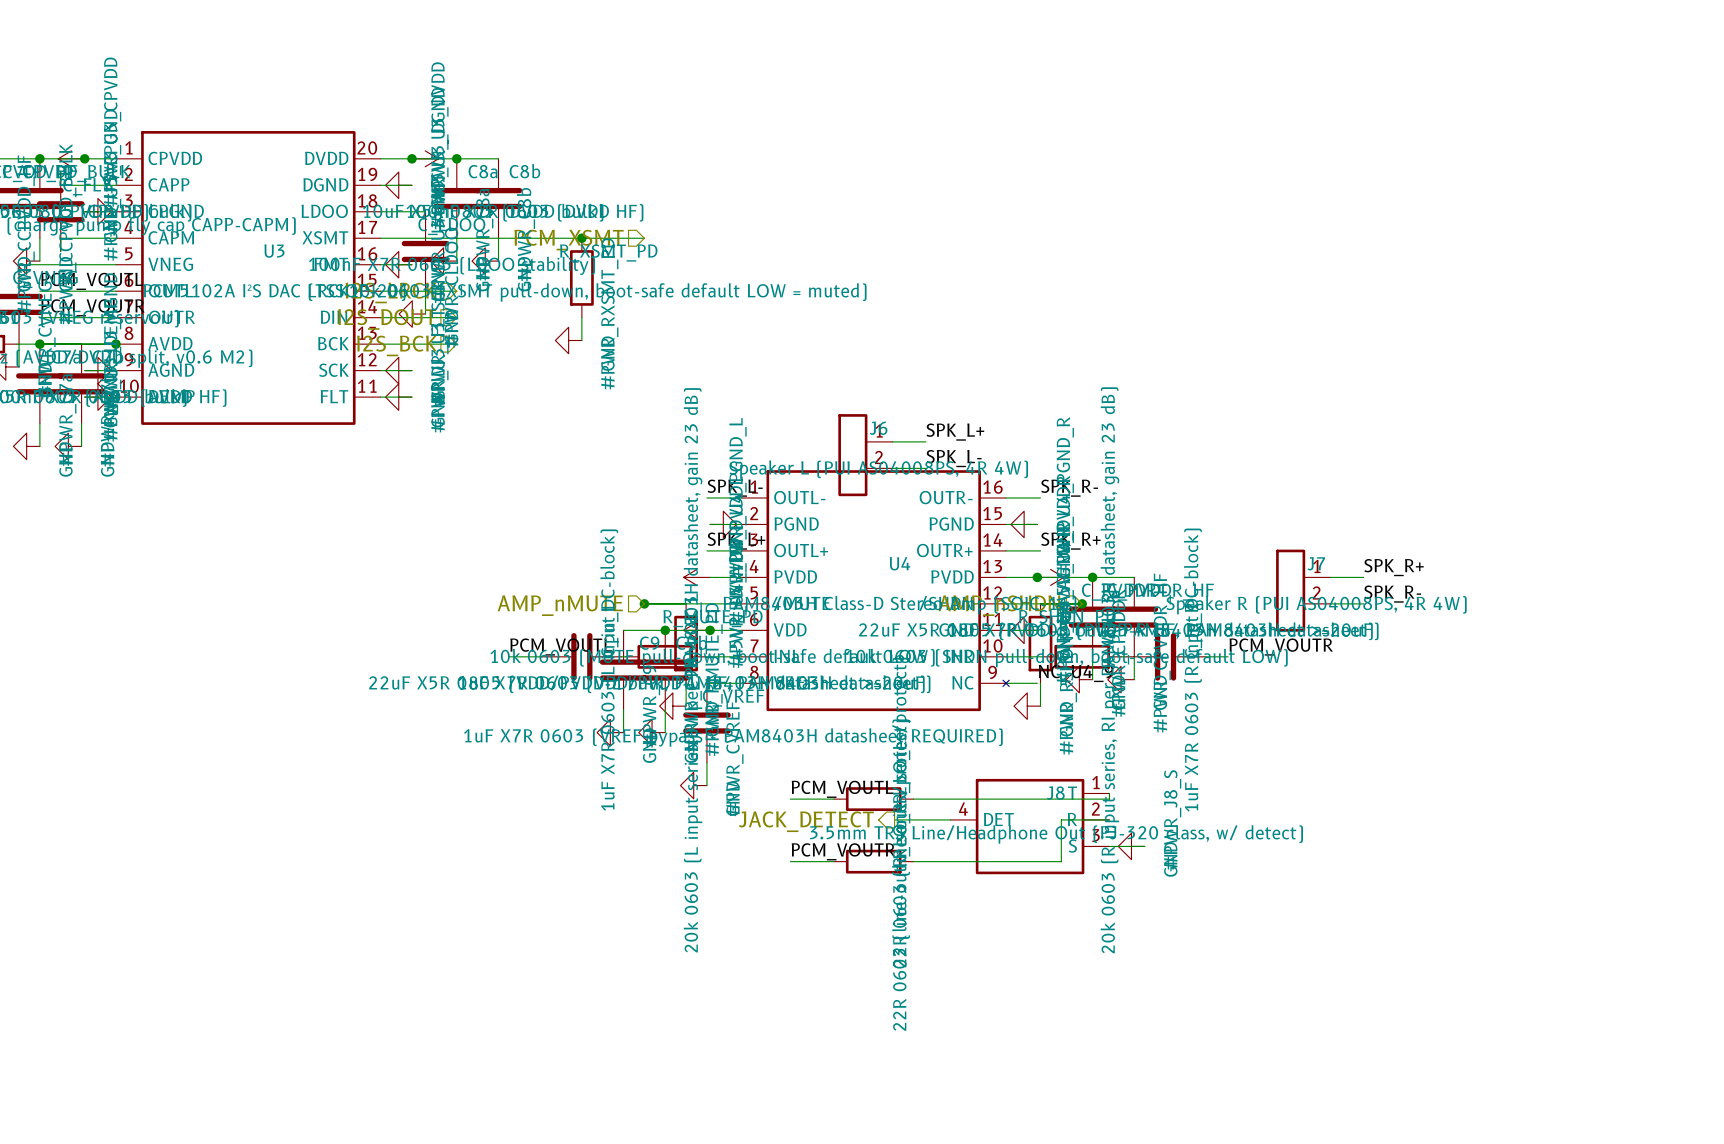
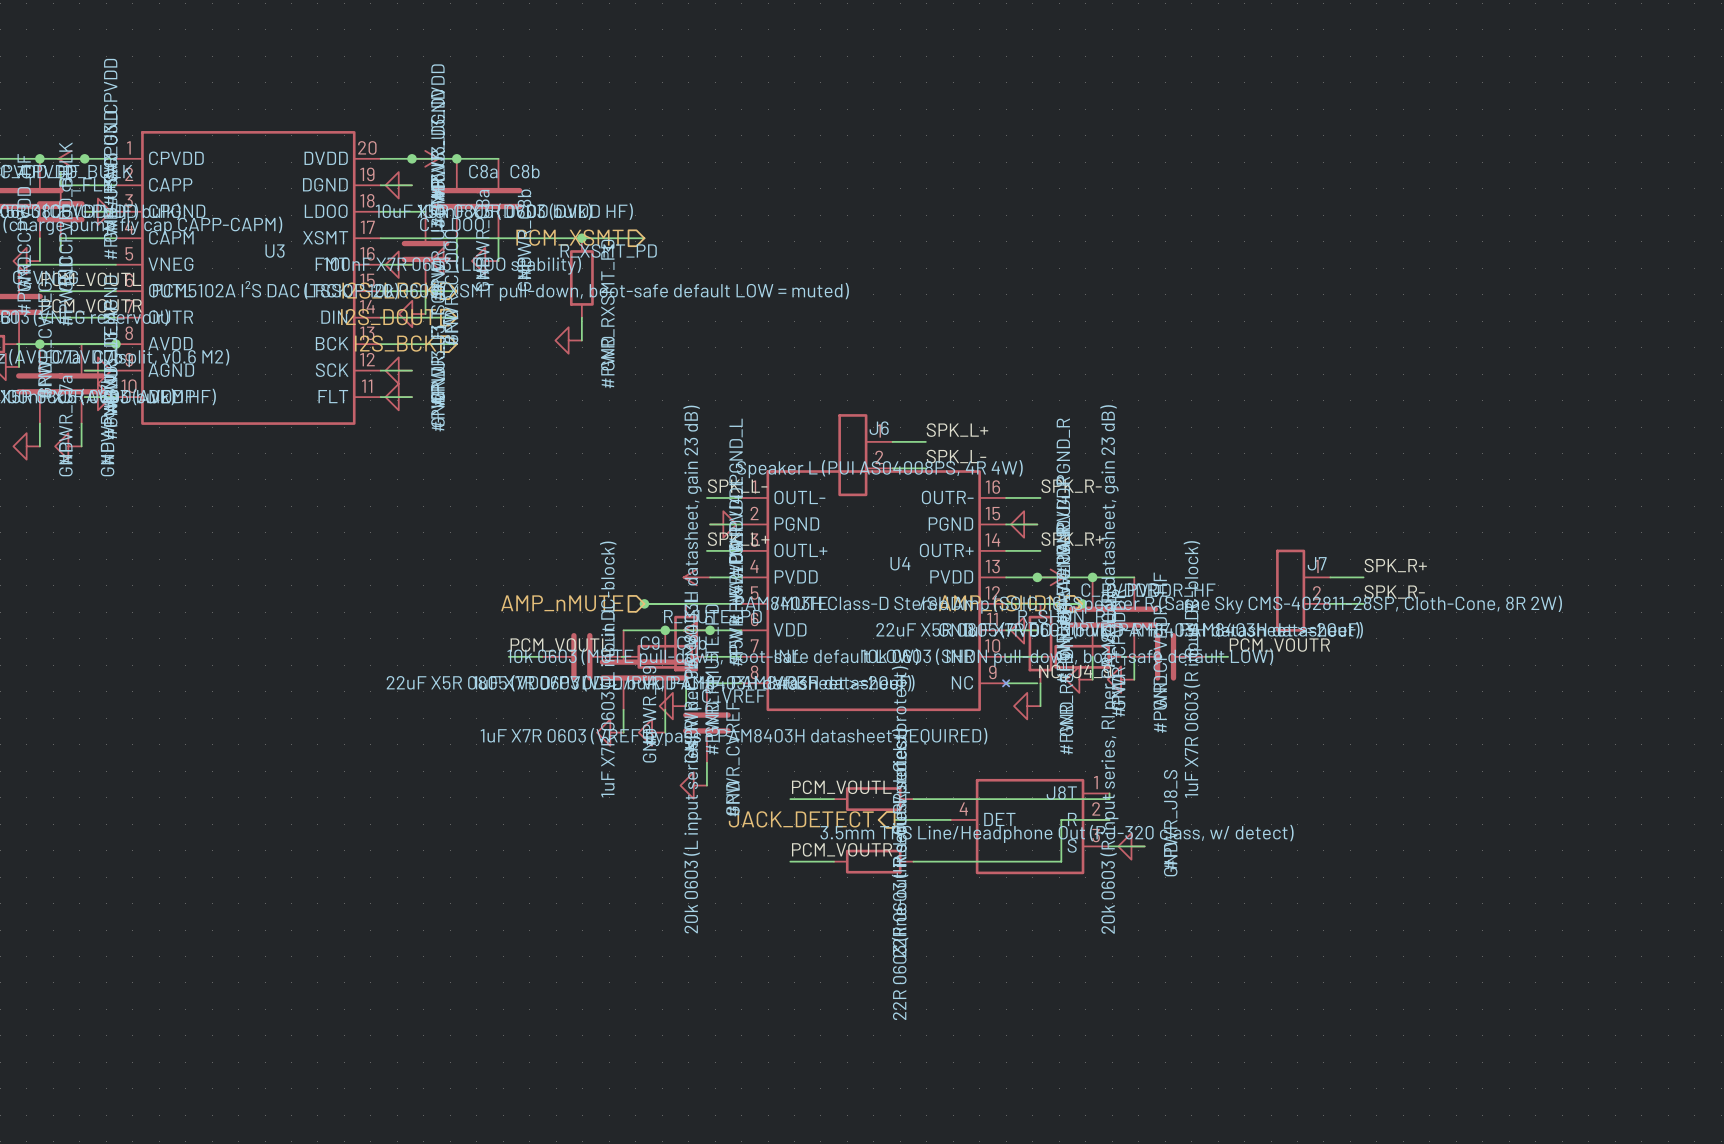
J7 value: Speaker R (PUI AS04008PS, 4R 4W) (1316, 605) -> Speaker R (Same Sky CMS-402811-28SP, Cloth-Cone, 8R 2W) (1317, 604)

